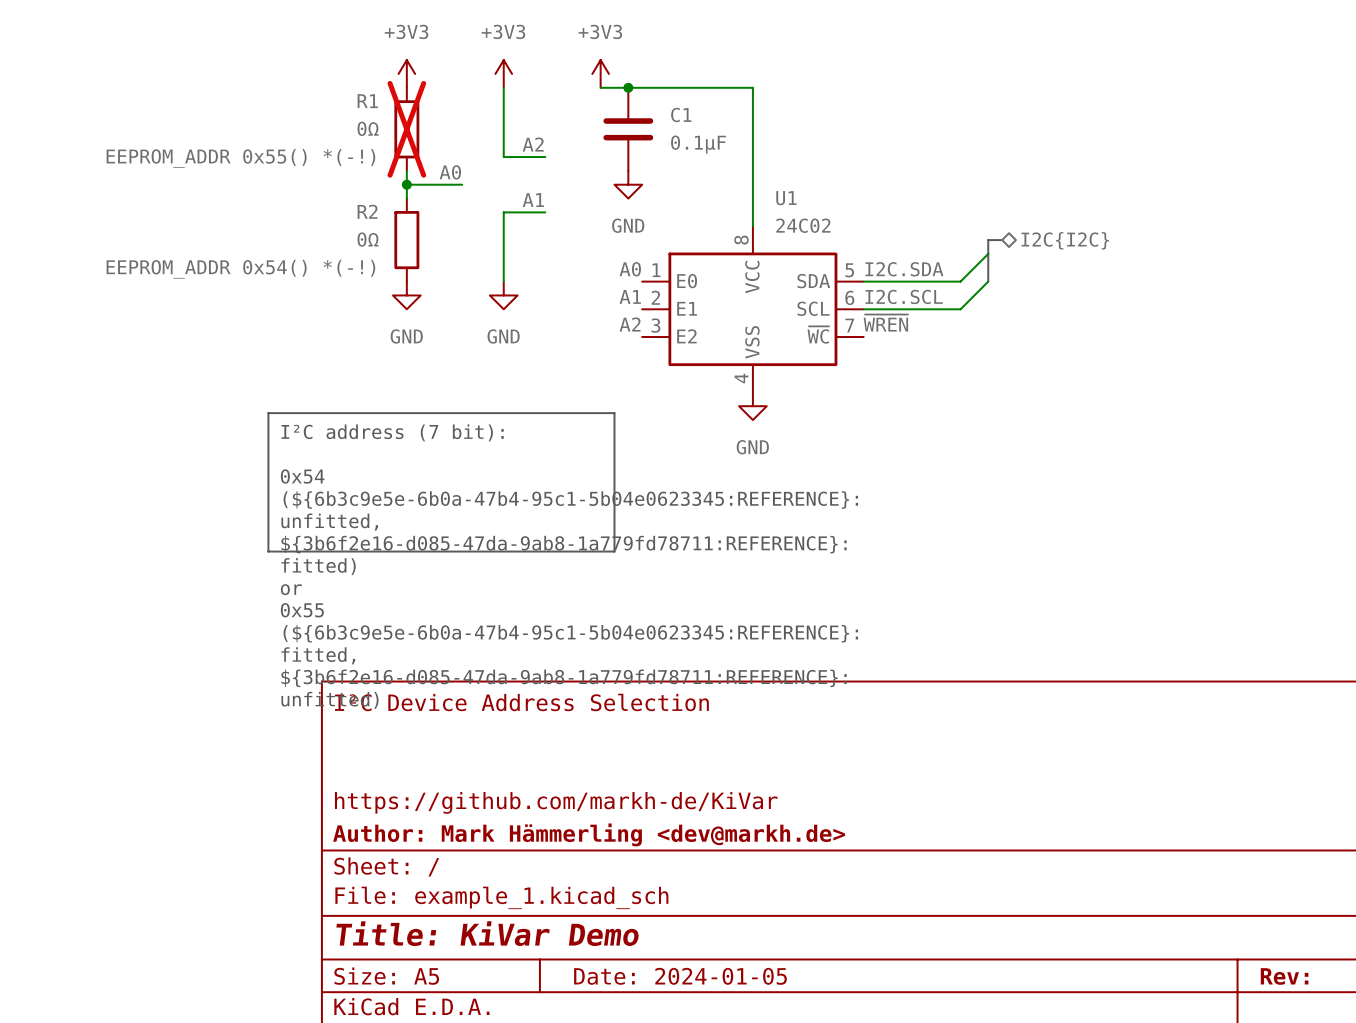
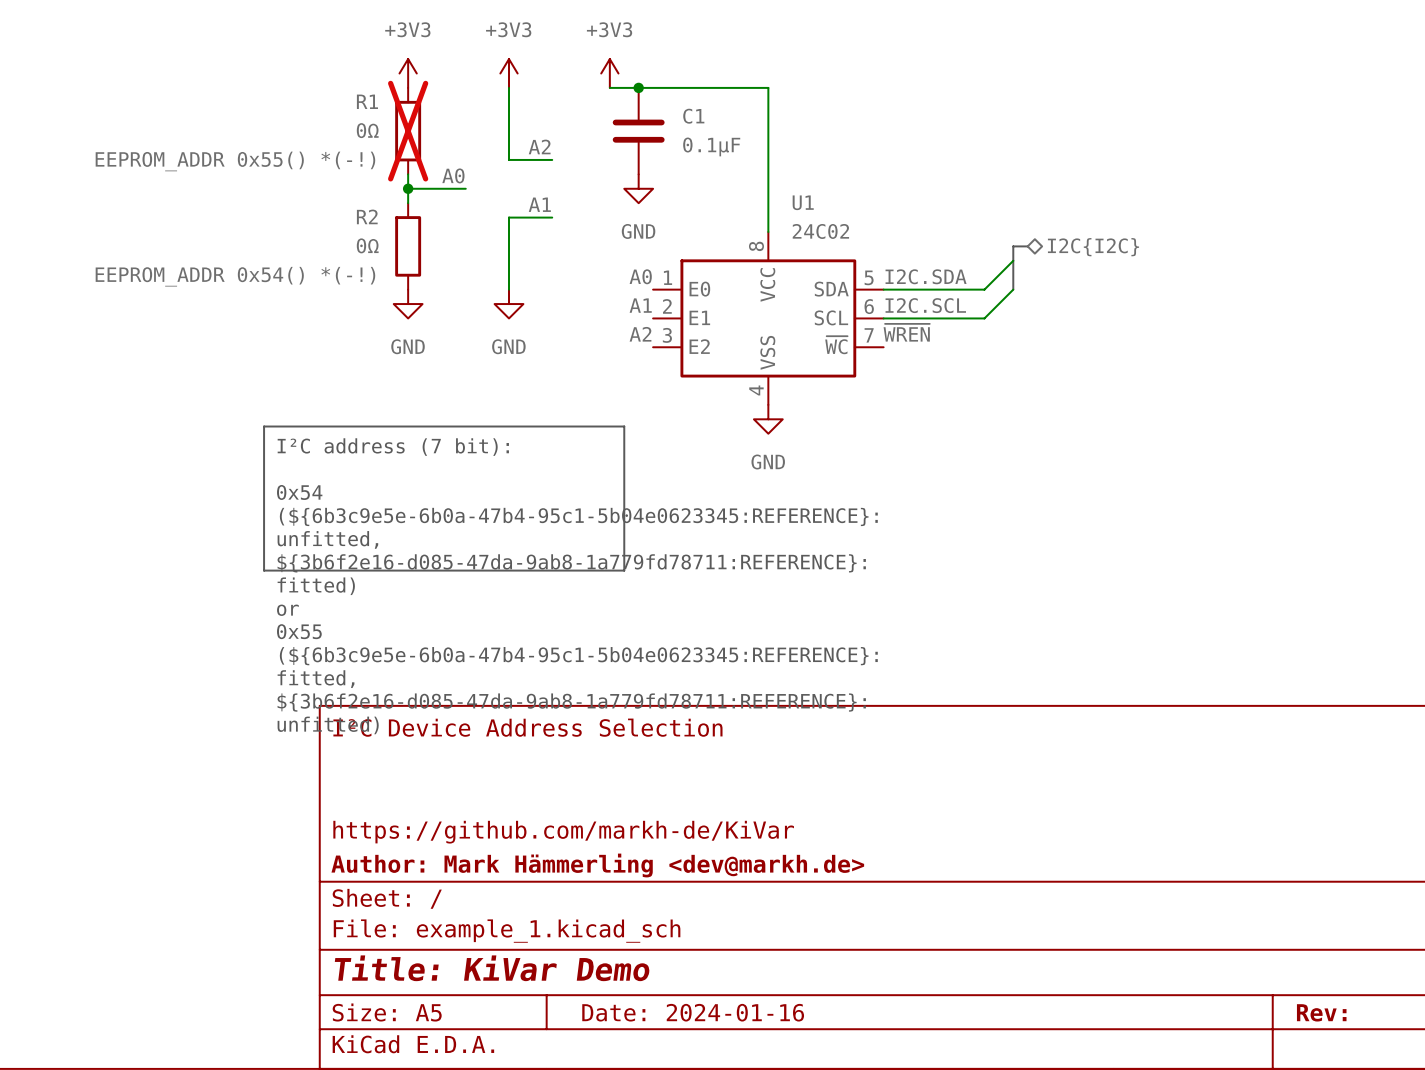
title block: Date: 2024-01-05 (680, 976) -> Date: 2024-01-16 (693, 1012)

